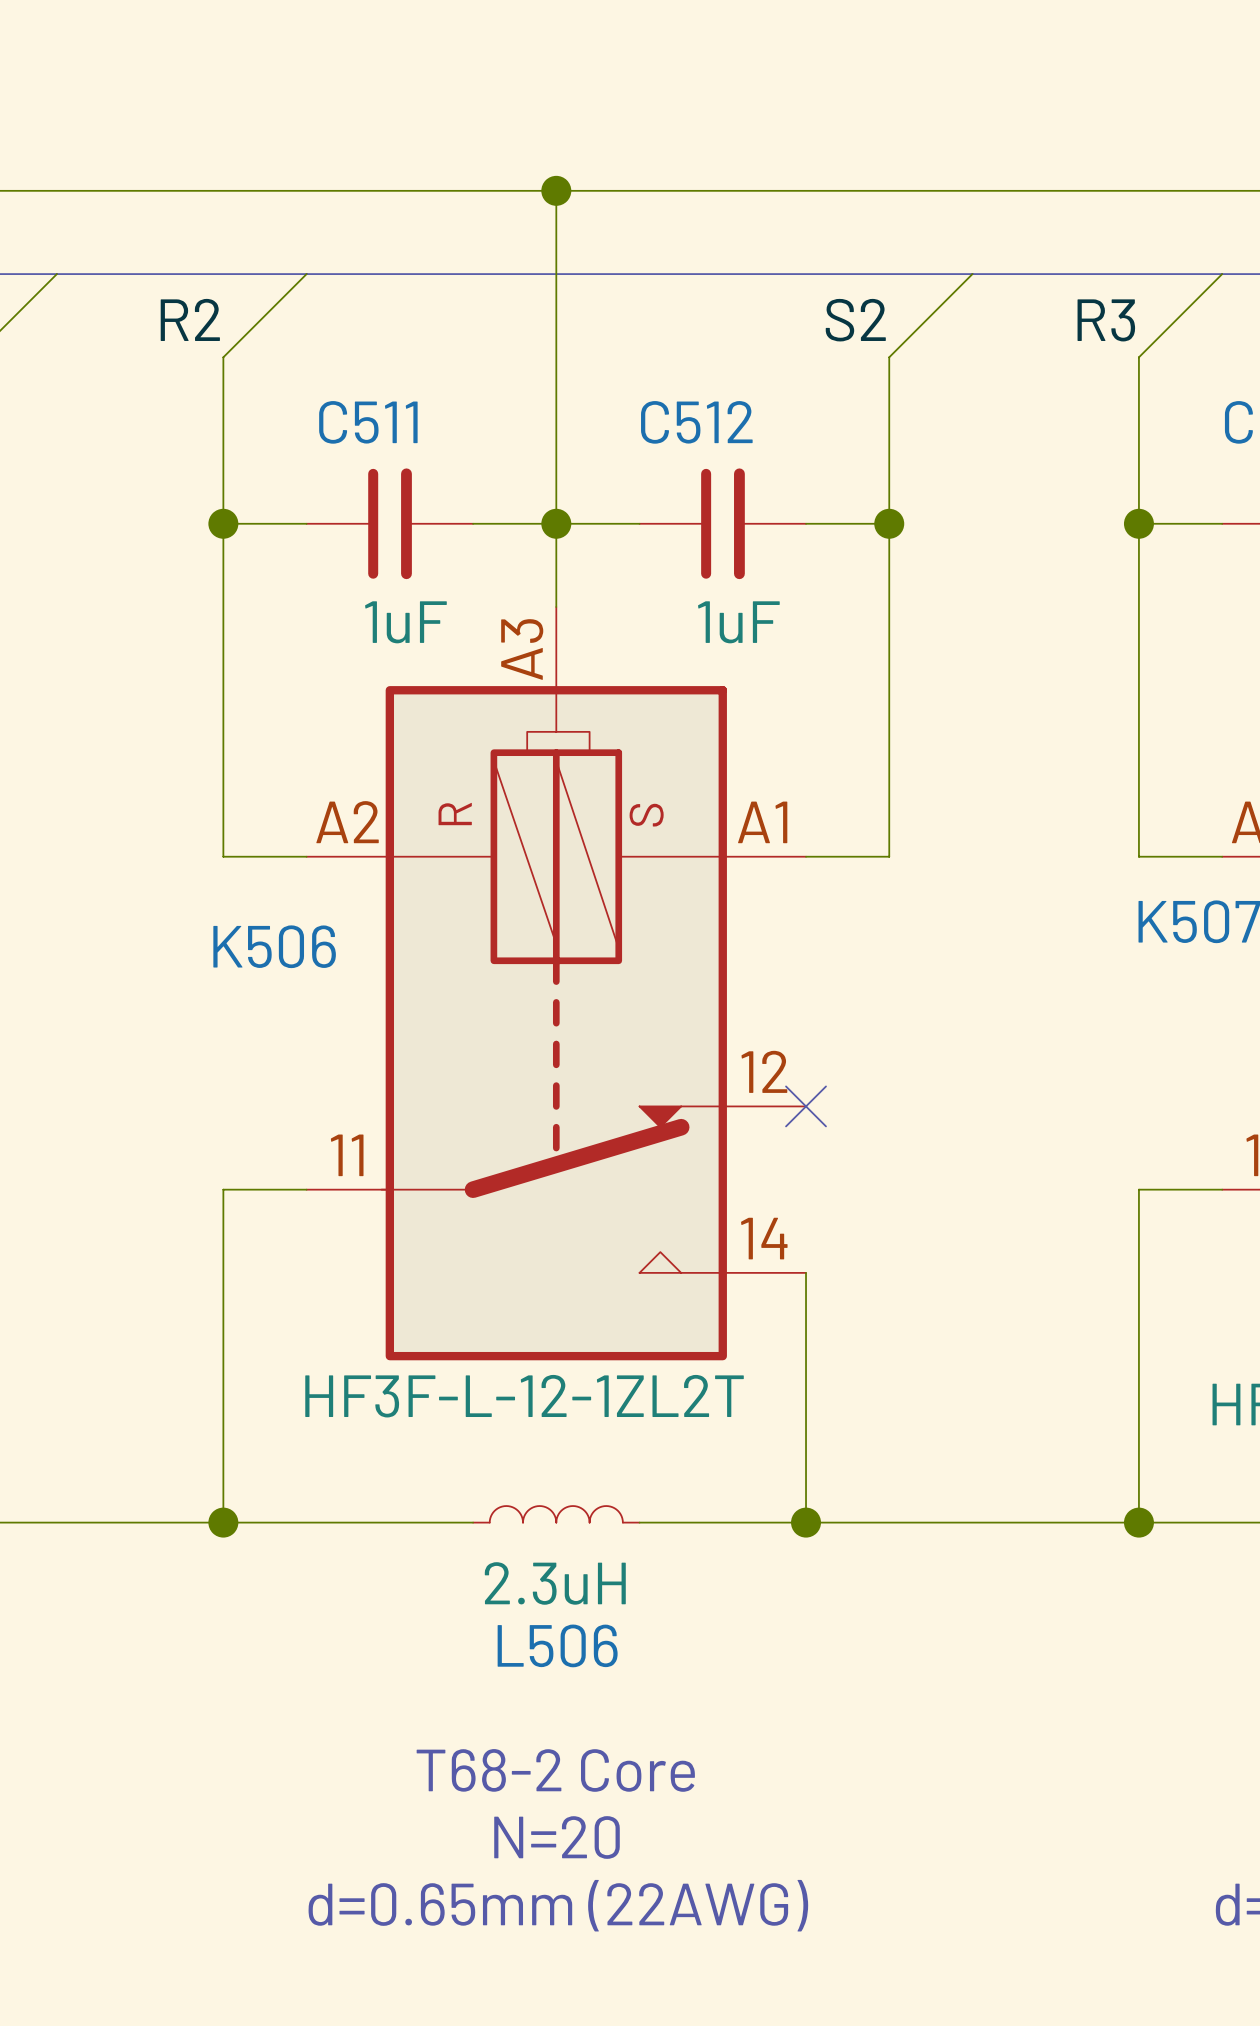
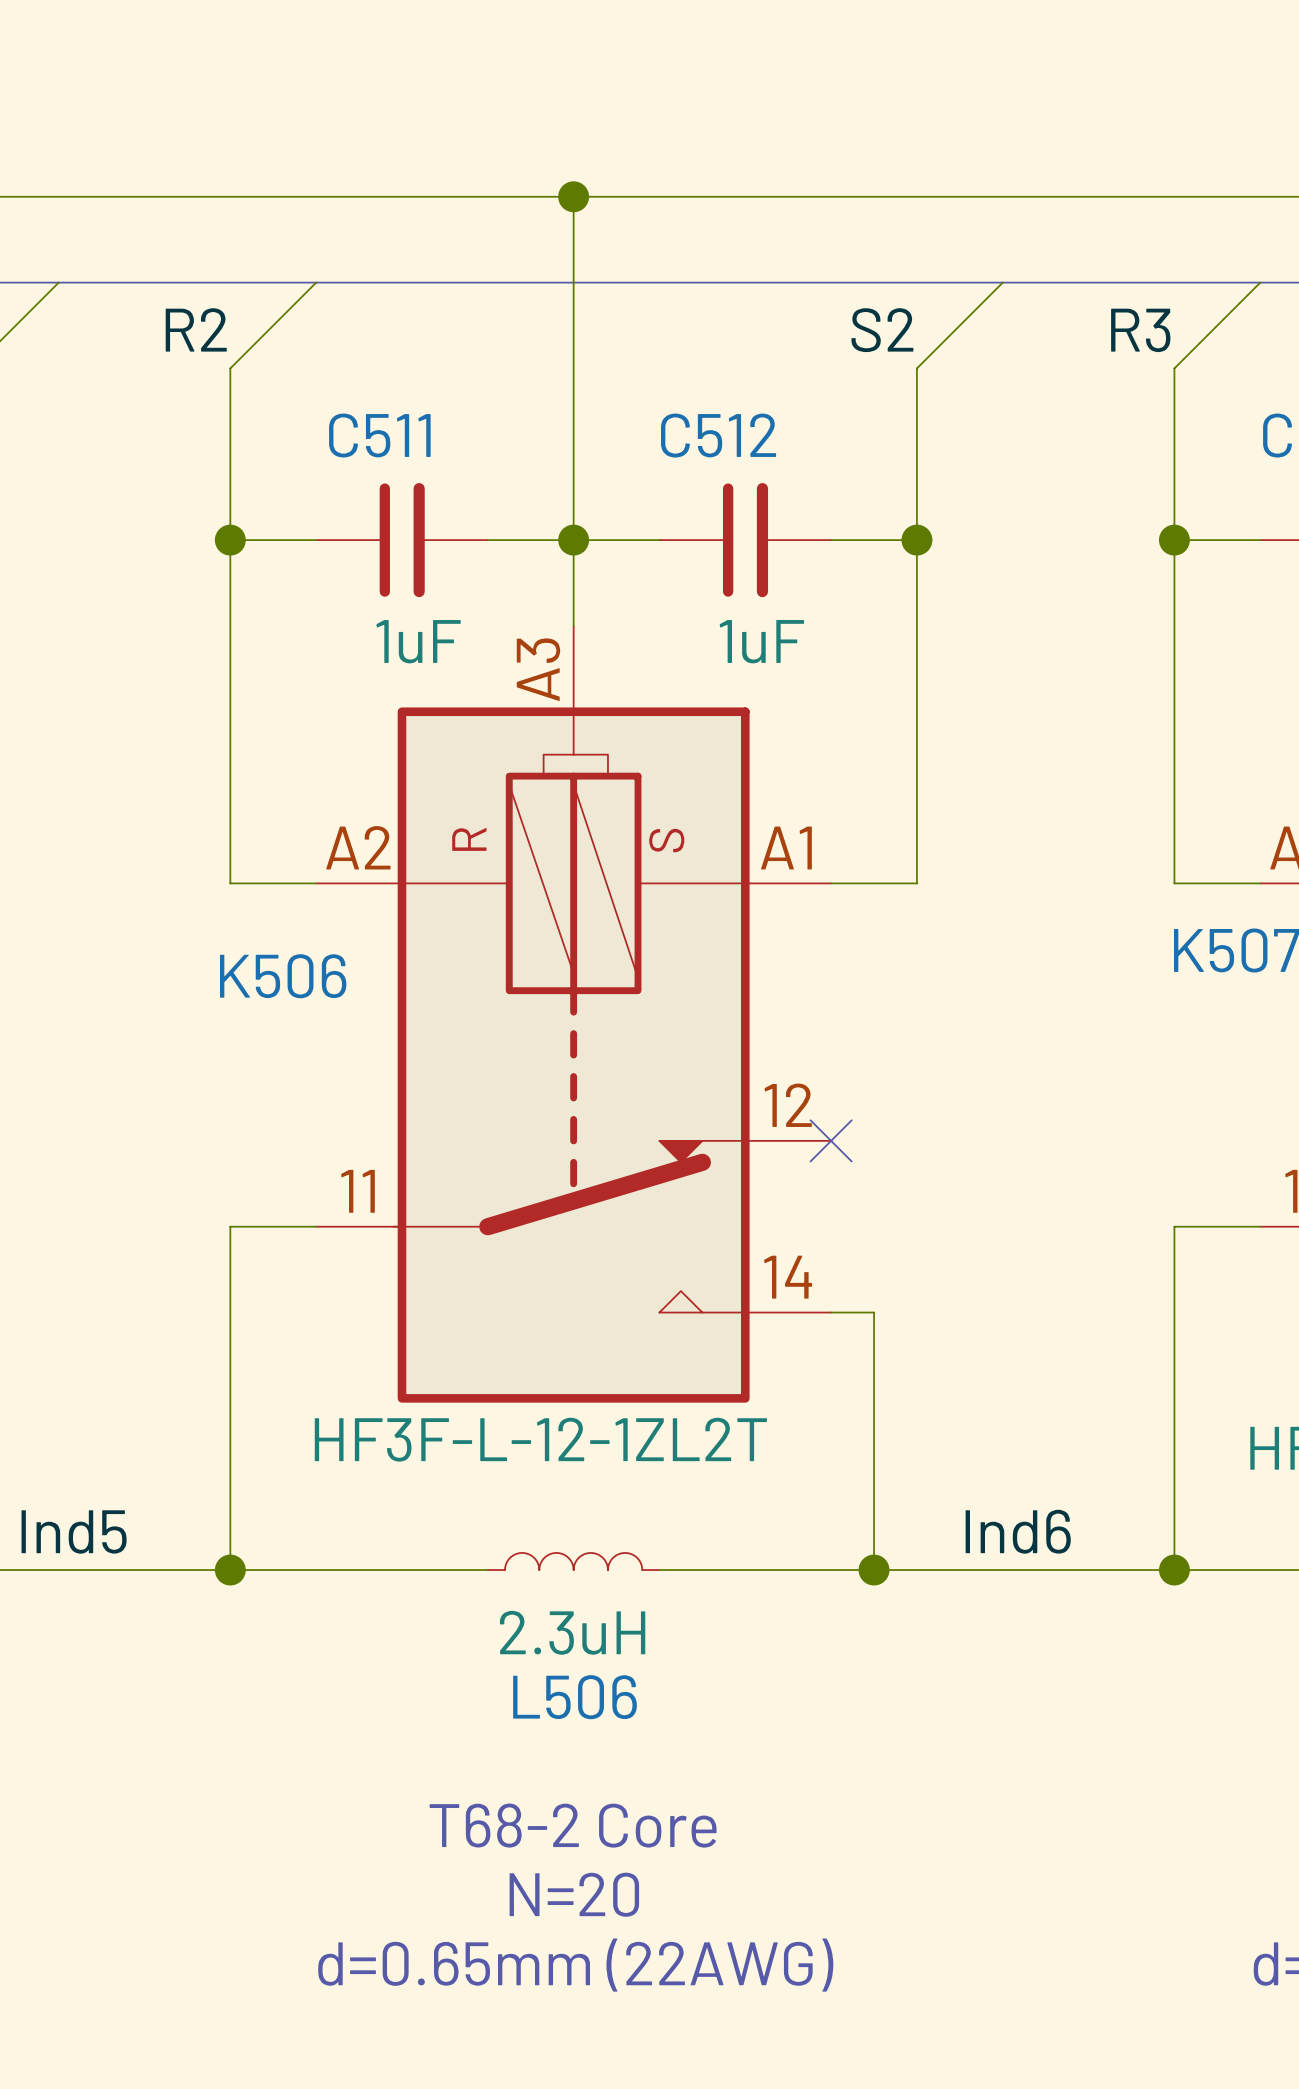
wire: (806, 1272) (806, 1522) -> (831, 1312) (874, 1312) (874, 1570)
label: none -> Ind5 (74, 1531)
label: none -> Ind6 (1018, 1531)
junction position: (806, 1522) -> (874, 1570)

